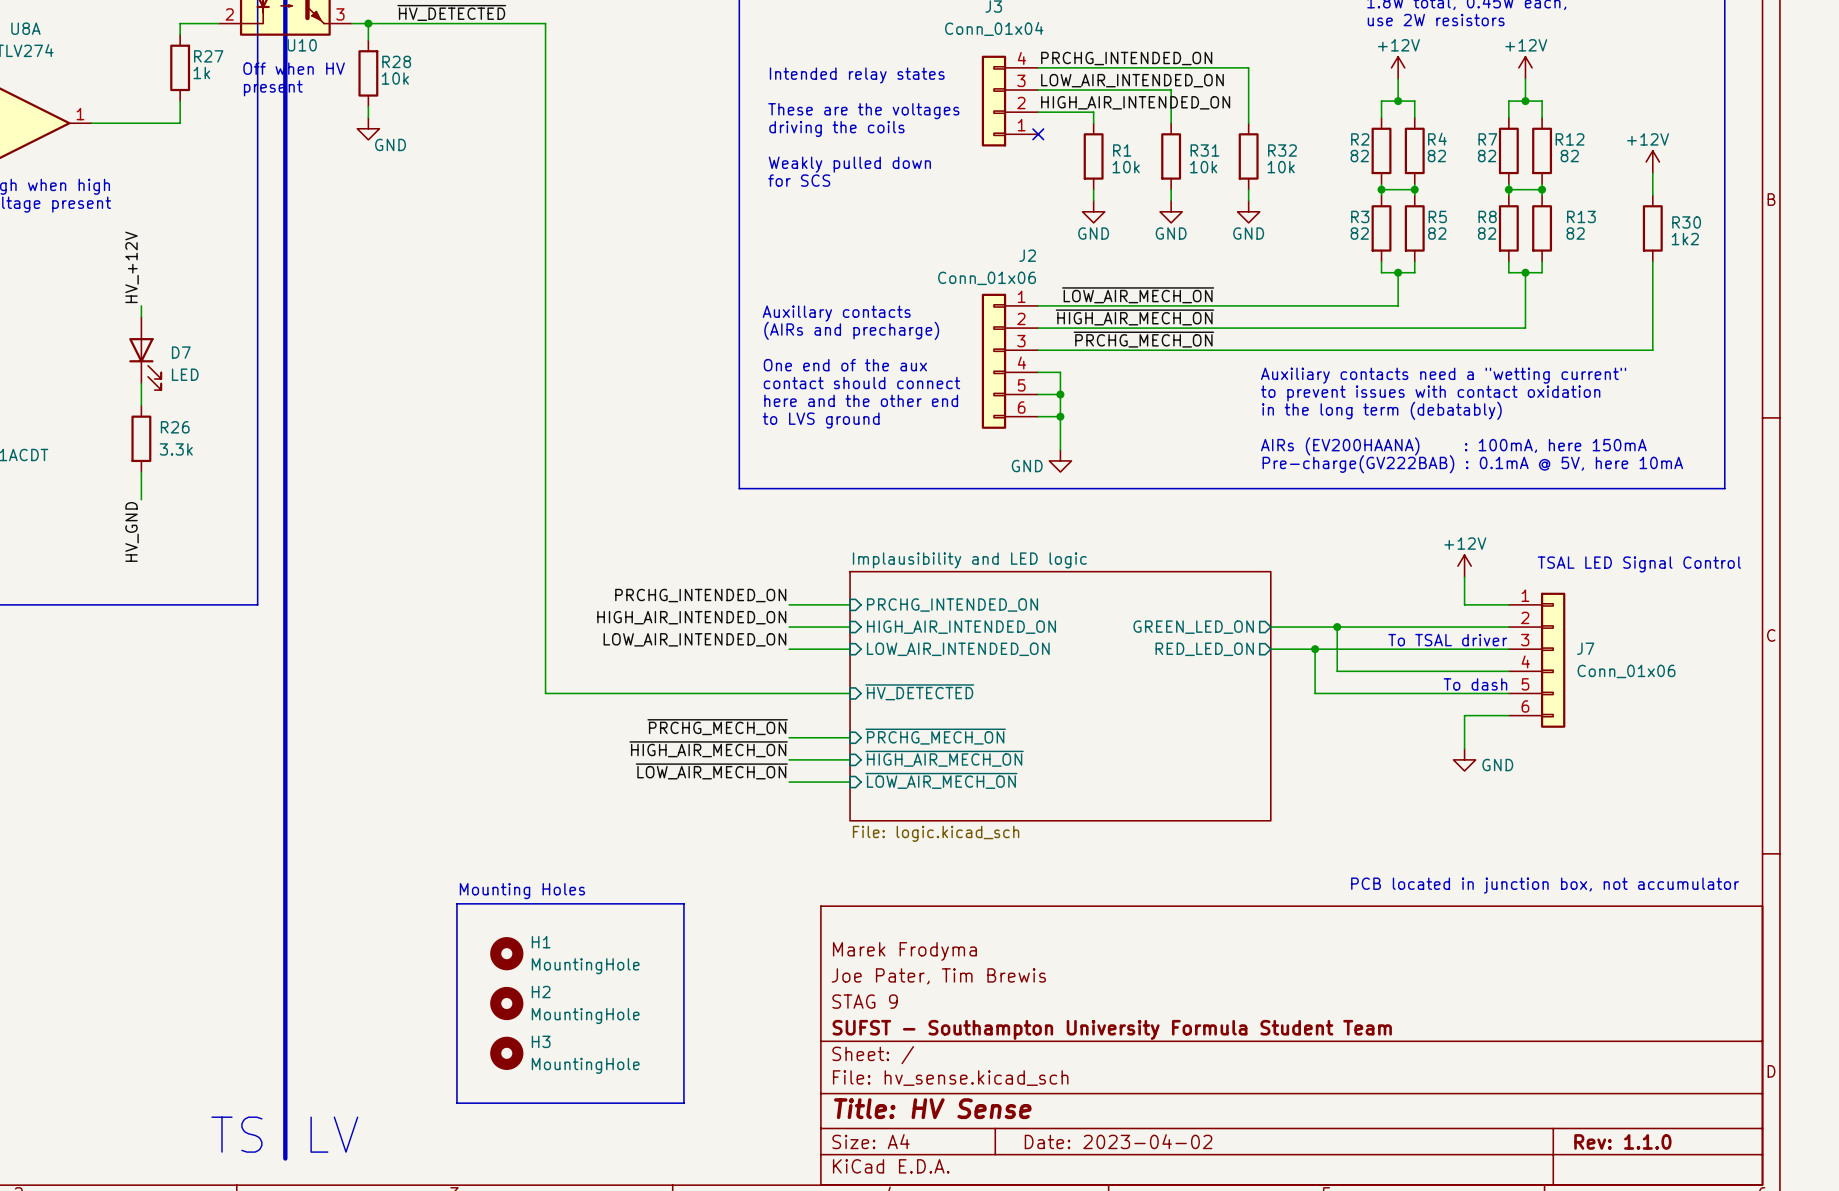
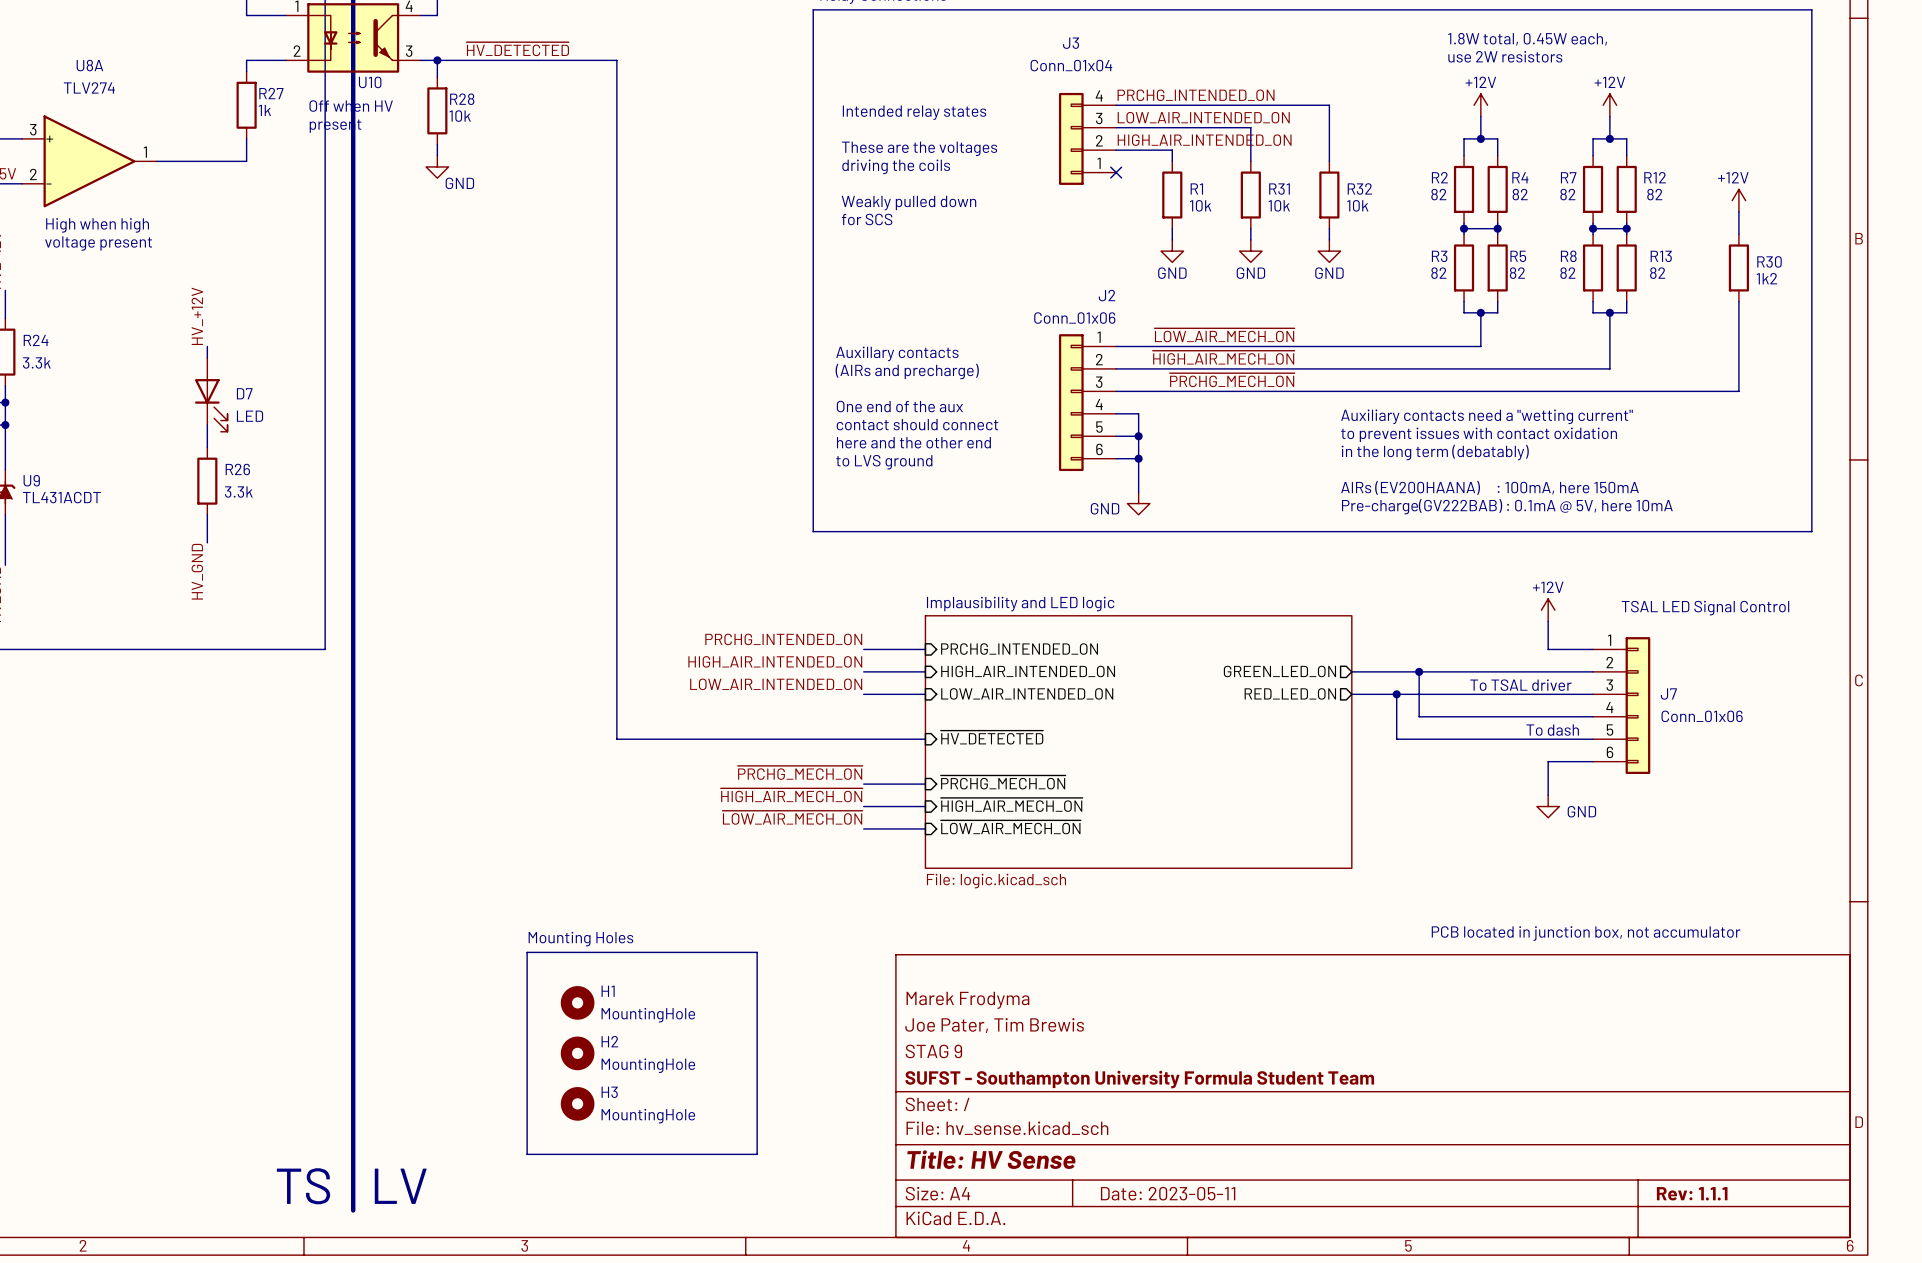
title block: Date: 2023-04-02 (1118, 1141) -> Date: 2023-05-11 (1168, 1193)
title block: Rev: 1.1.0 (1622, 1141) -> Rev: 1.1.1 (1692, 1193)

